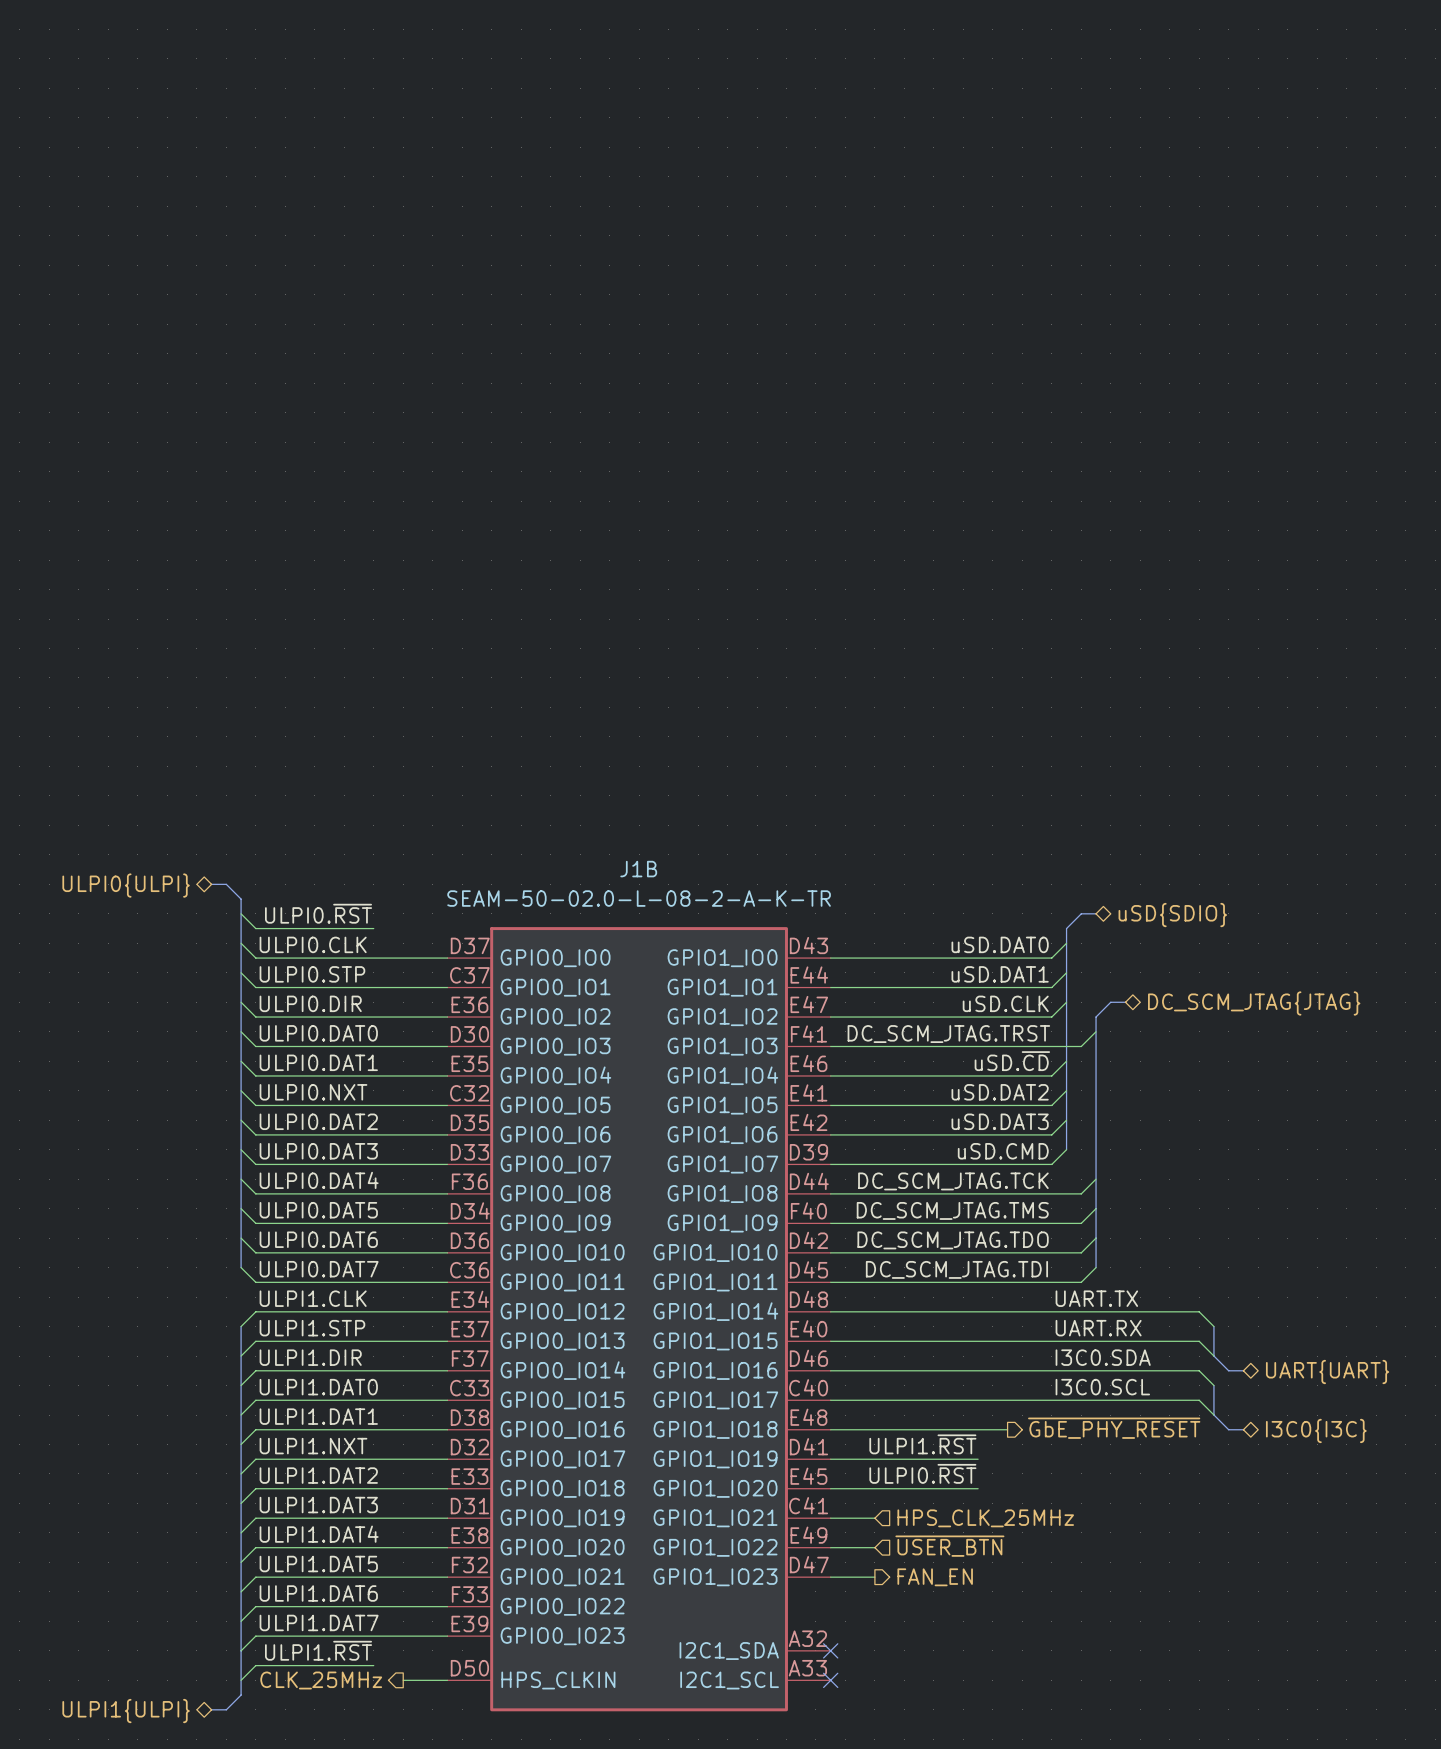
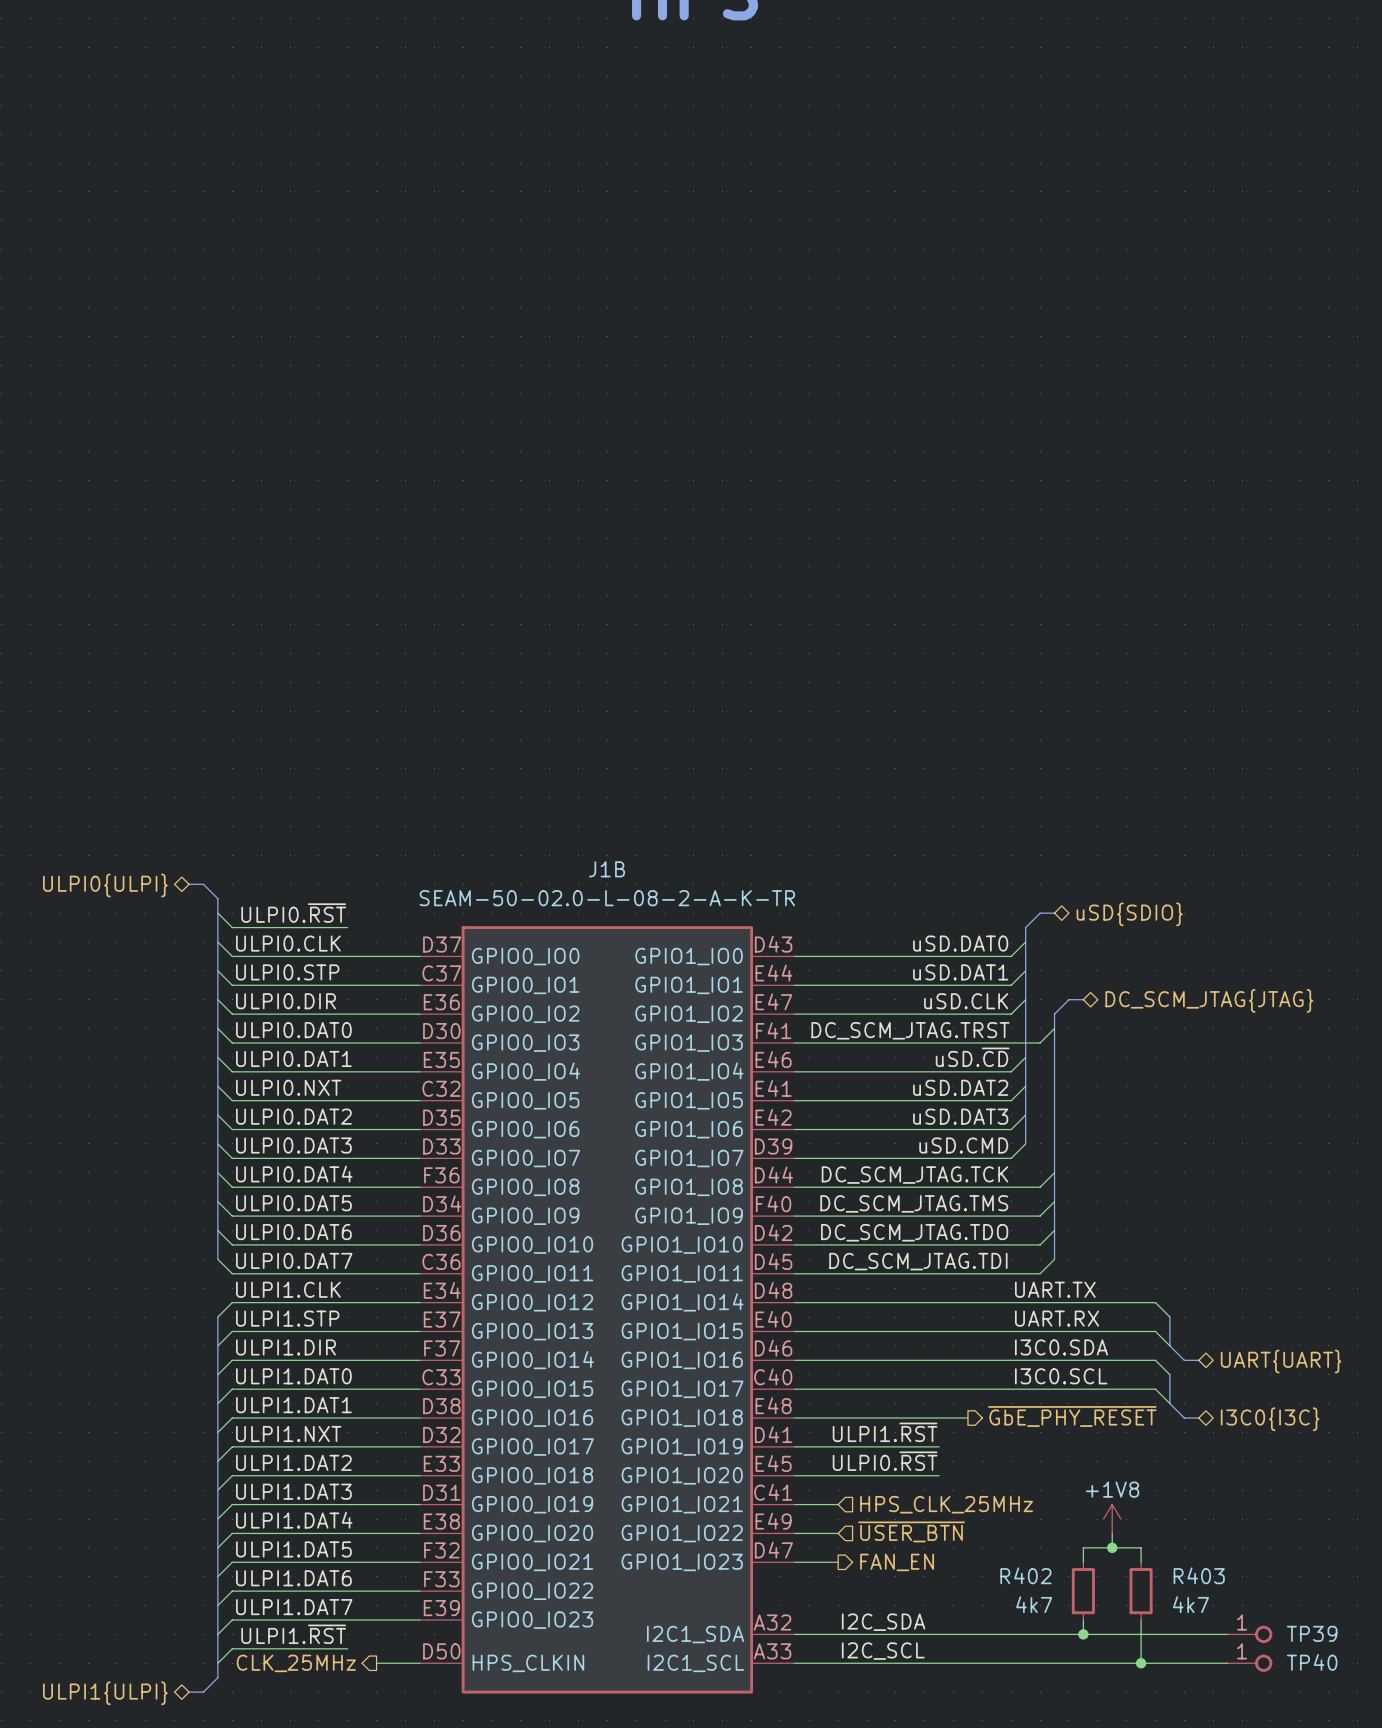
power symbol: none -> +1V8 (1112, 1519)
wire: none -> (1112, 1533) (1112, 1547)
junction: none -> (1112, 1547)
wire: none -> (1083, 1562) (1083, 1547) (1141, 1547) (1141, 1562)
R402: none -> (1083, 1591)
R403: none -> (1141, 1591)
wire: none -> (1083, 1619) (1083, 1634)
wire: none -> (1141, 1619) (1141, 1663)
label: none -> I2C_SDA (883, 1622)
wire: none -> (794, 1634) (1227, 1634)
no-connect mark: (830, 1650) -> none
junction: none -> (1083, 1634)
TP39: none -> (1249, 1634)
label: none -> I2C_SCL (883, 1651)
wire: none -> (794, 1663) (1227, 1663)
no-connect mark: (830, 1680) -> none
junction: none -> (1141, 1663)
TP40: none -> (1249, 1663)

